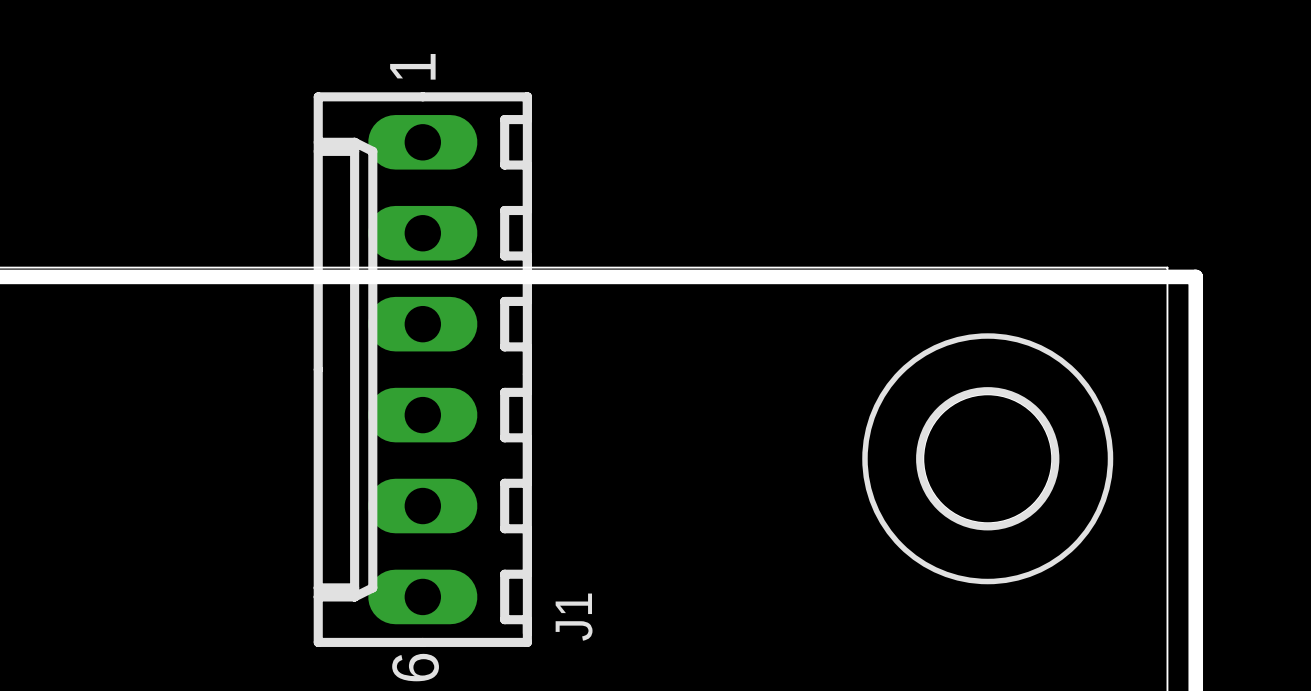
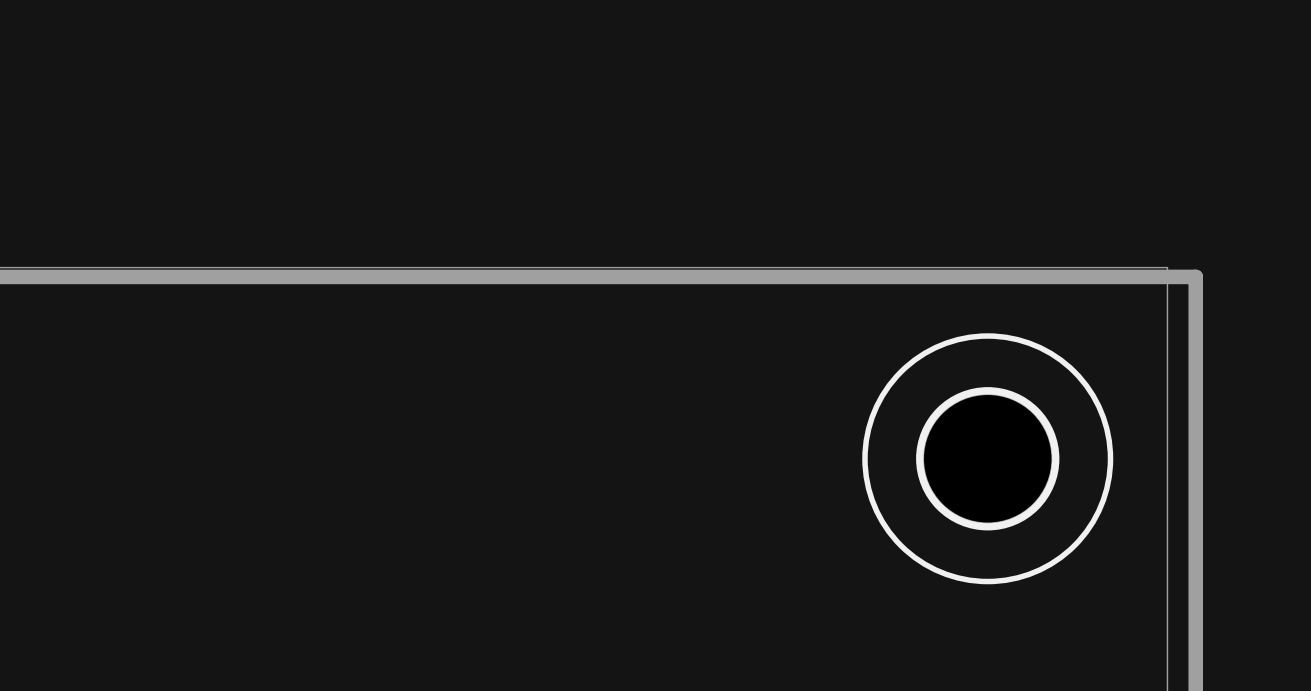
J1: (422, 369) -> none

